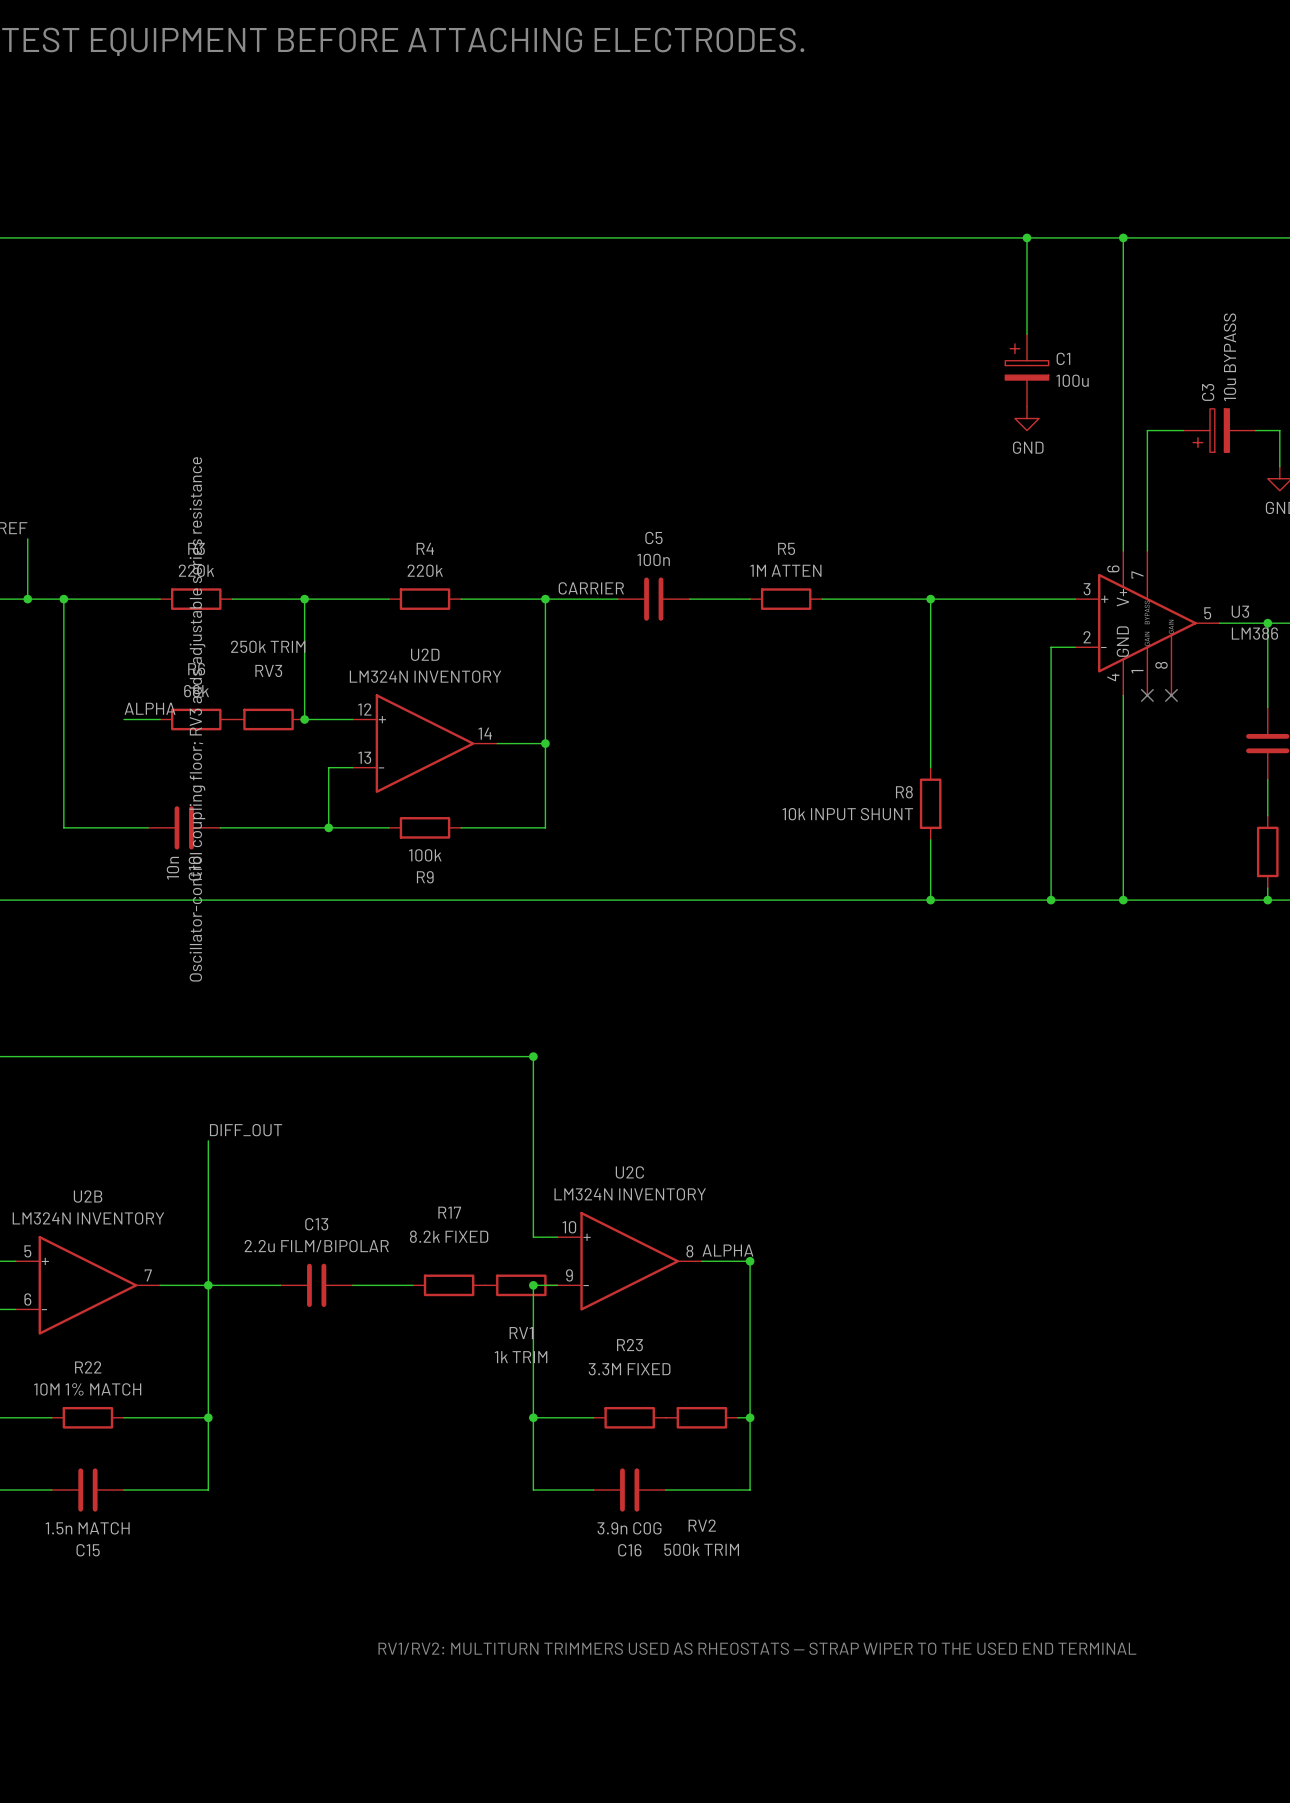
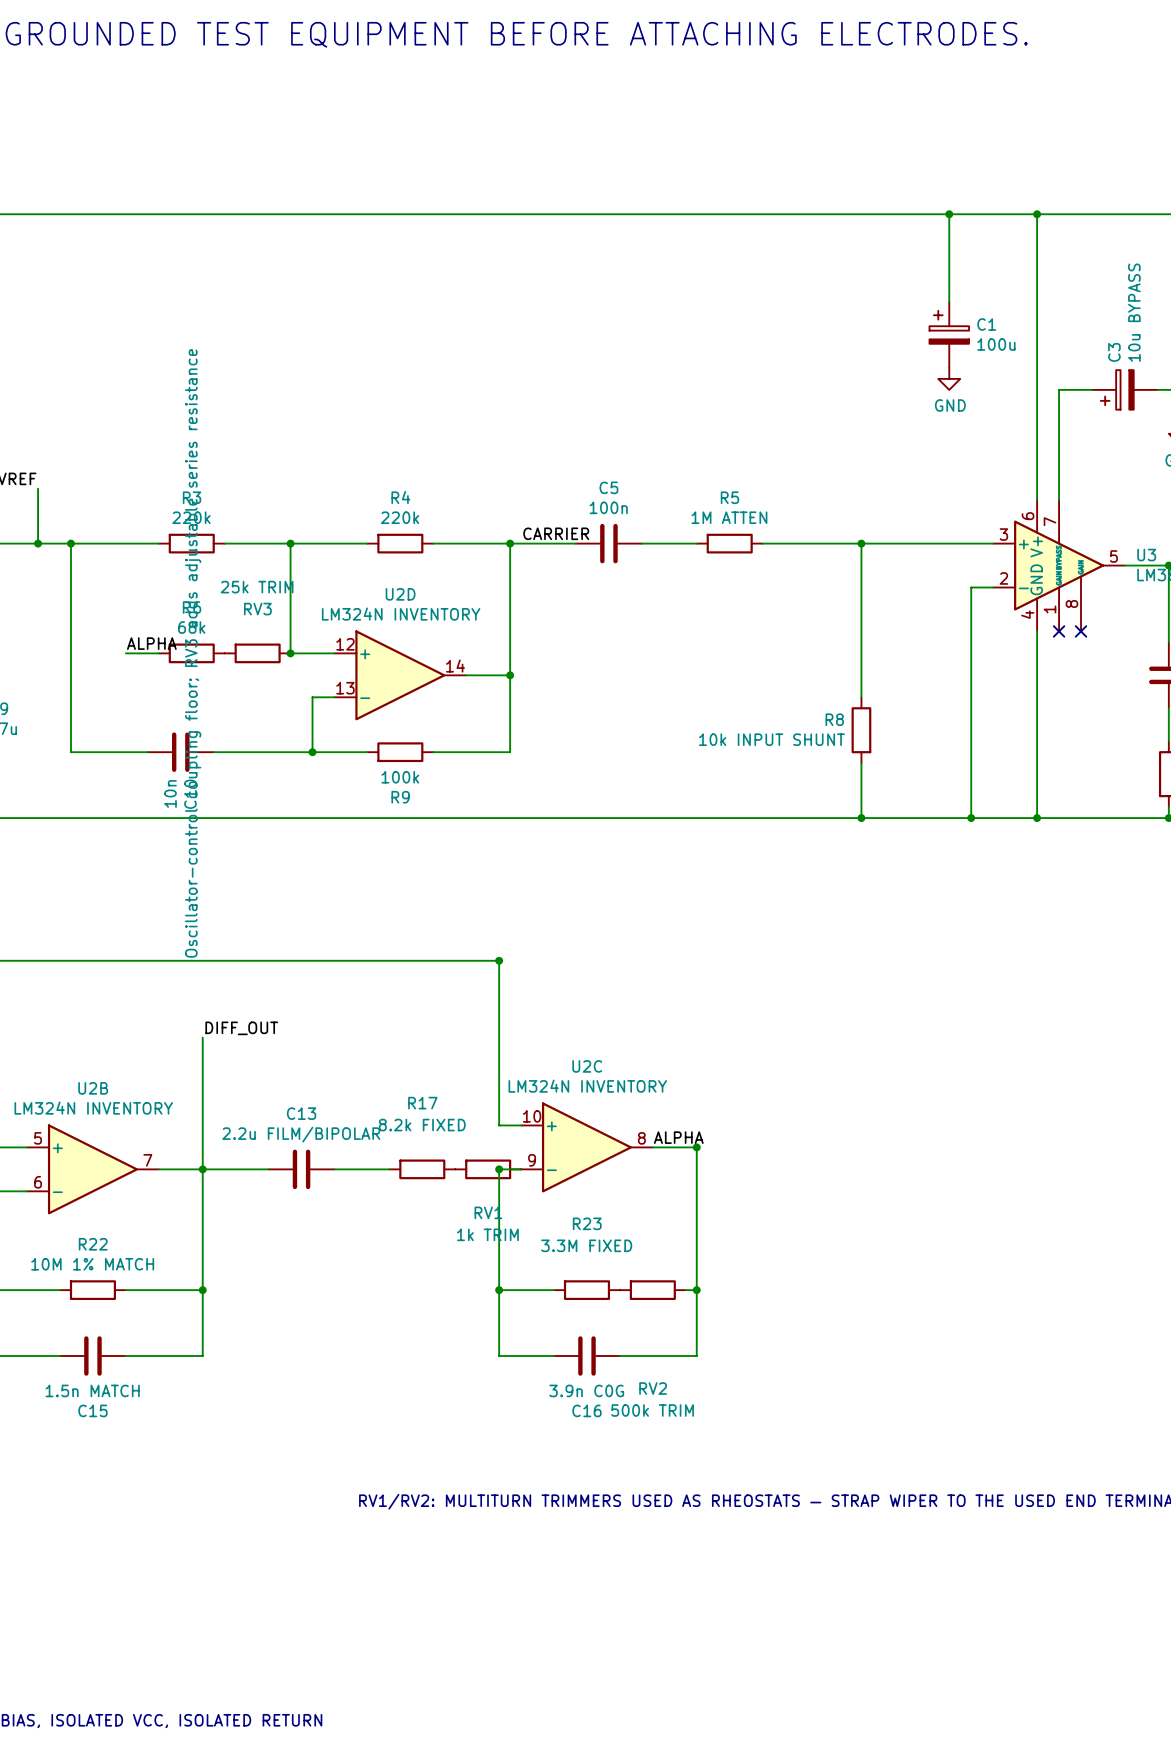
RV3 value: 250k TRIM (268, 646) -> 25k TRIM (257, 587)

